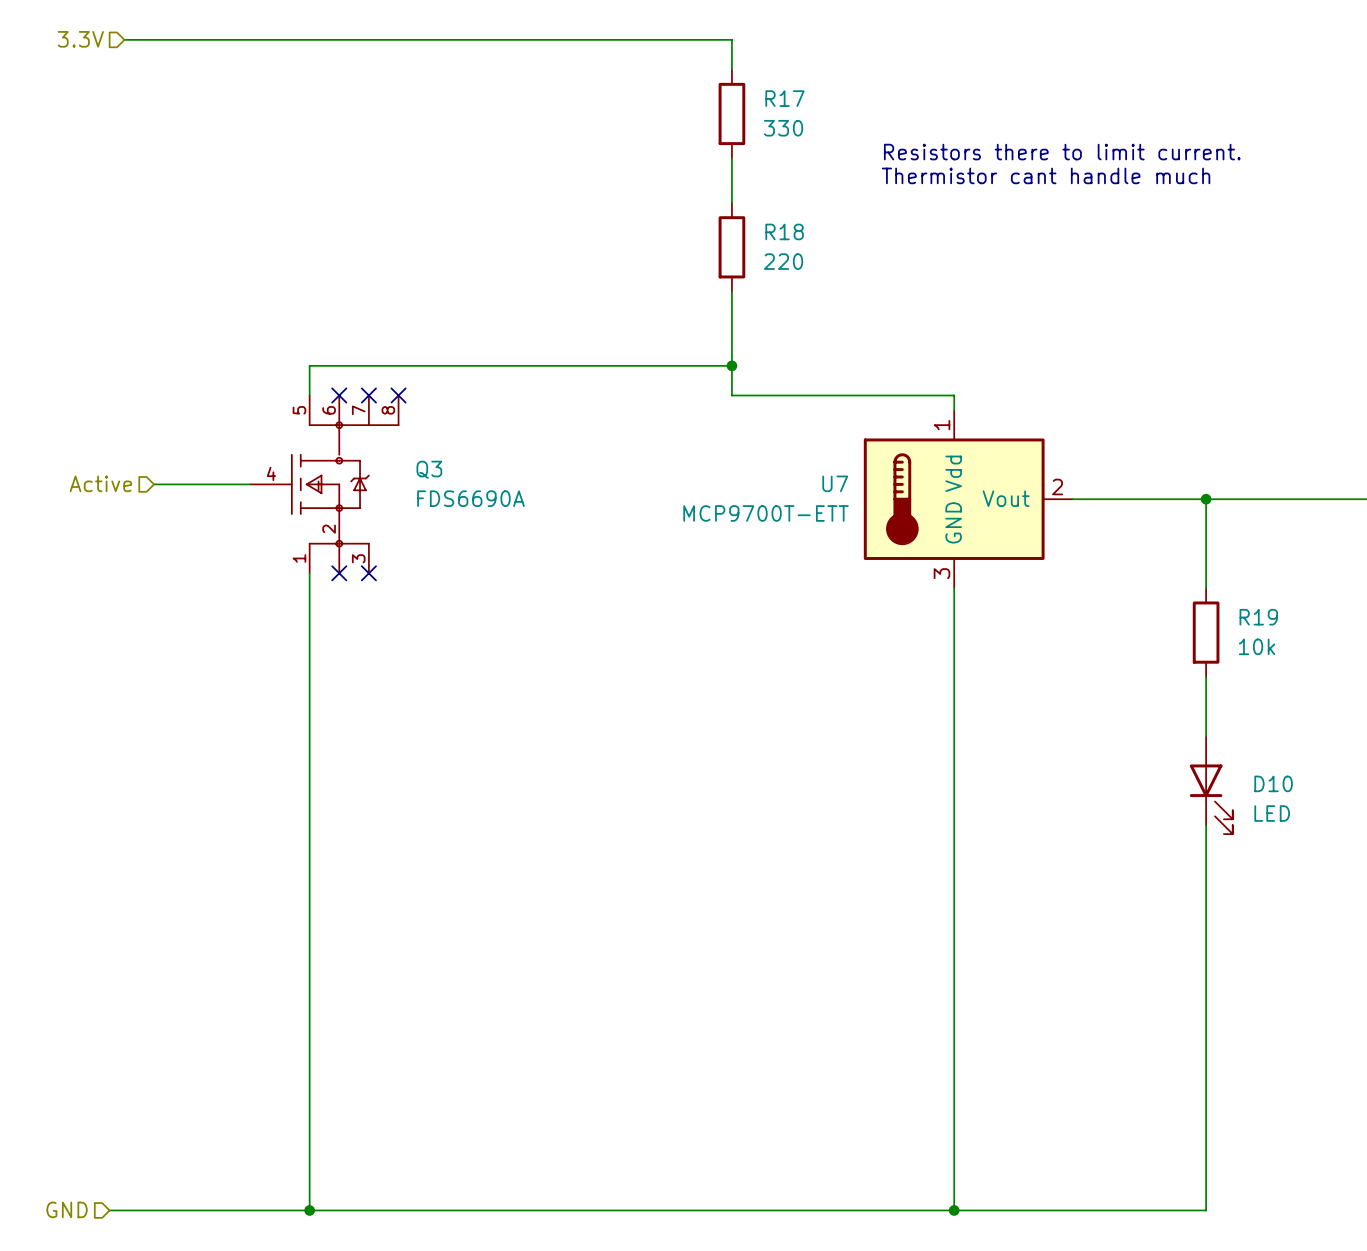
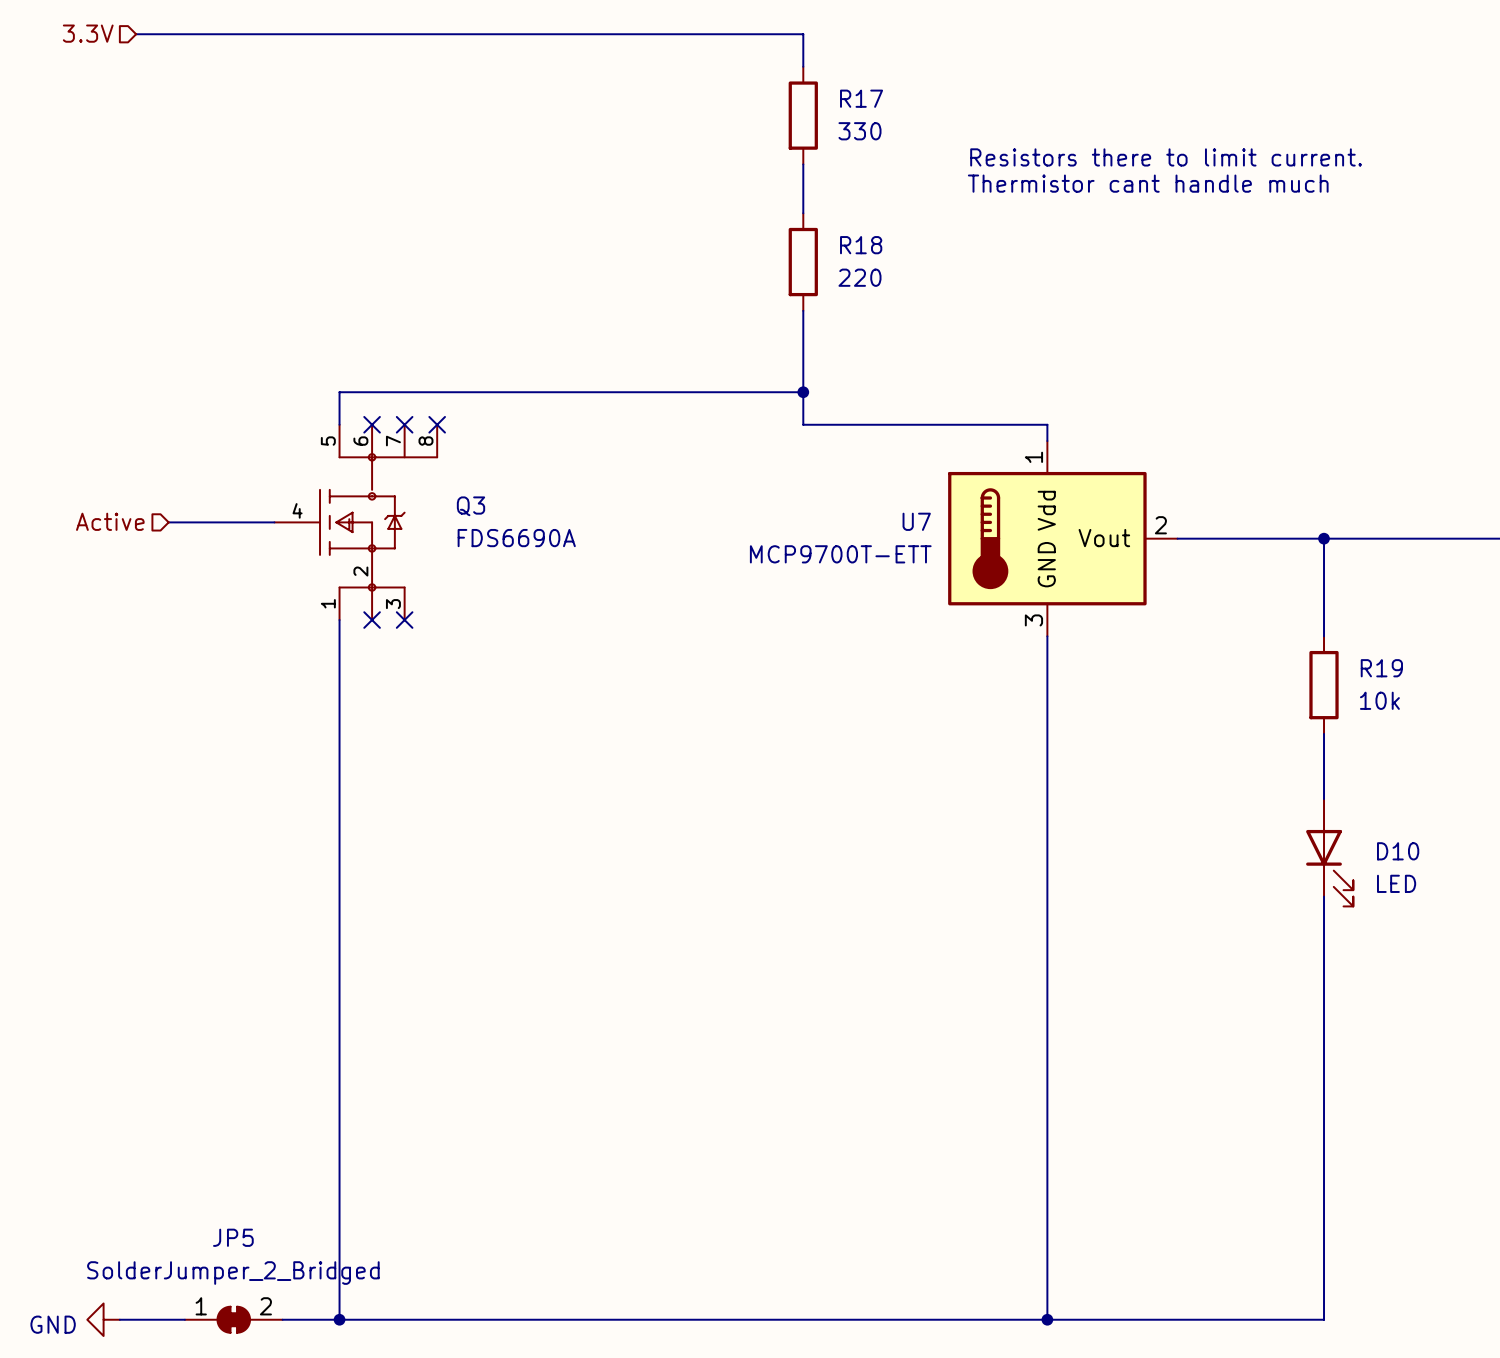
hierarchical label: GND (67, 1209) -> none
power symbol: none -> GND (103, 1319)
JP5: none -> SolderJumper_2_Bridged (233, 1319)

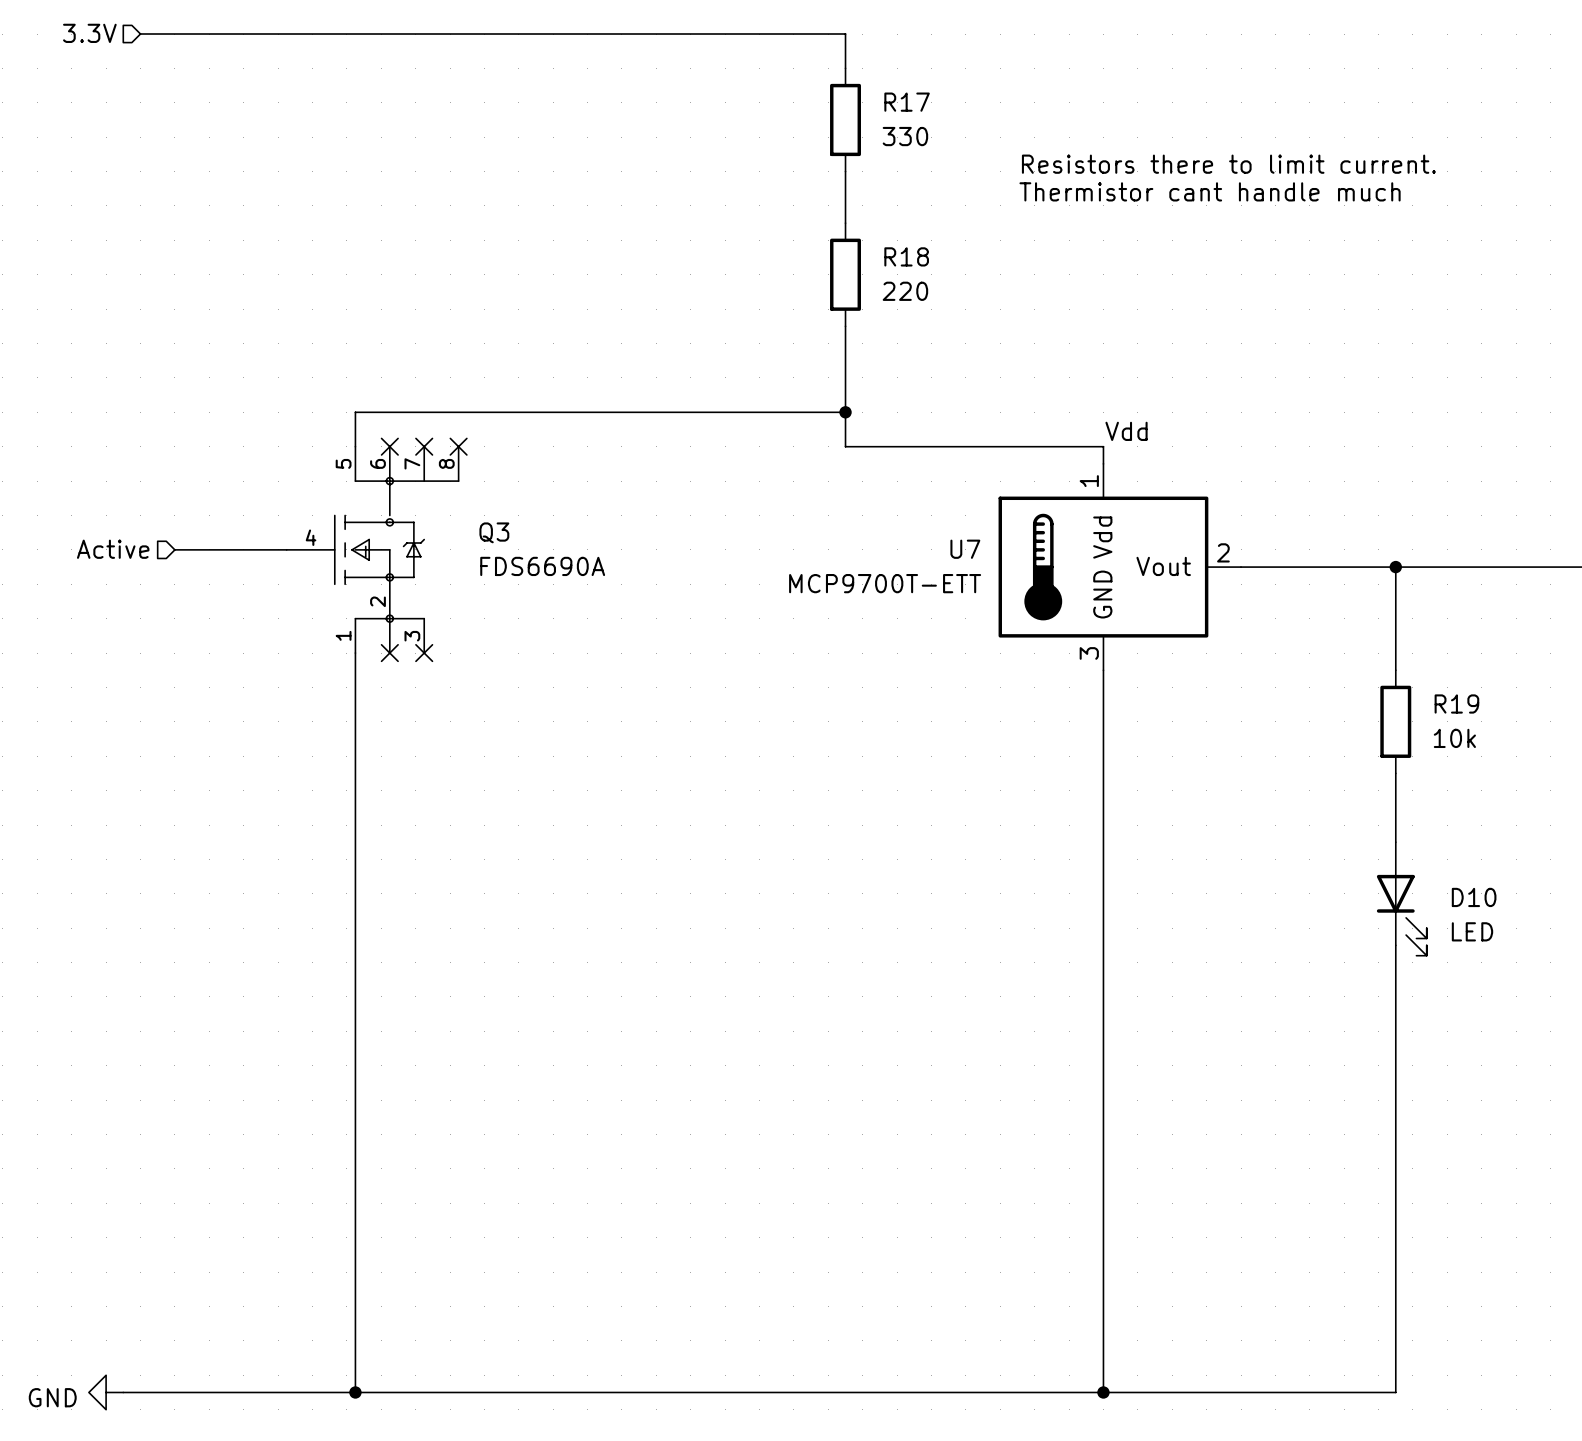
label: none -> Vdd (1126, 431)
JP5: SolderJumper_2_Bridged (233, 1319) -> none

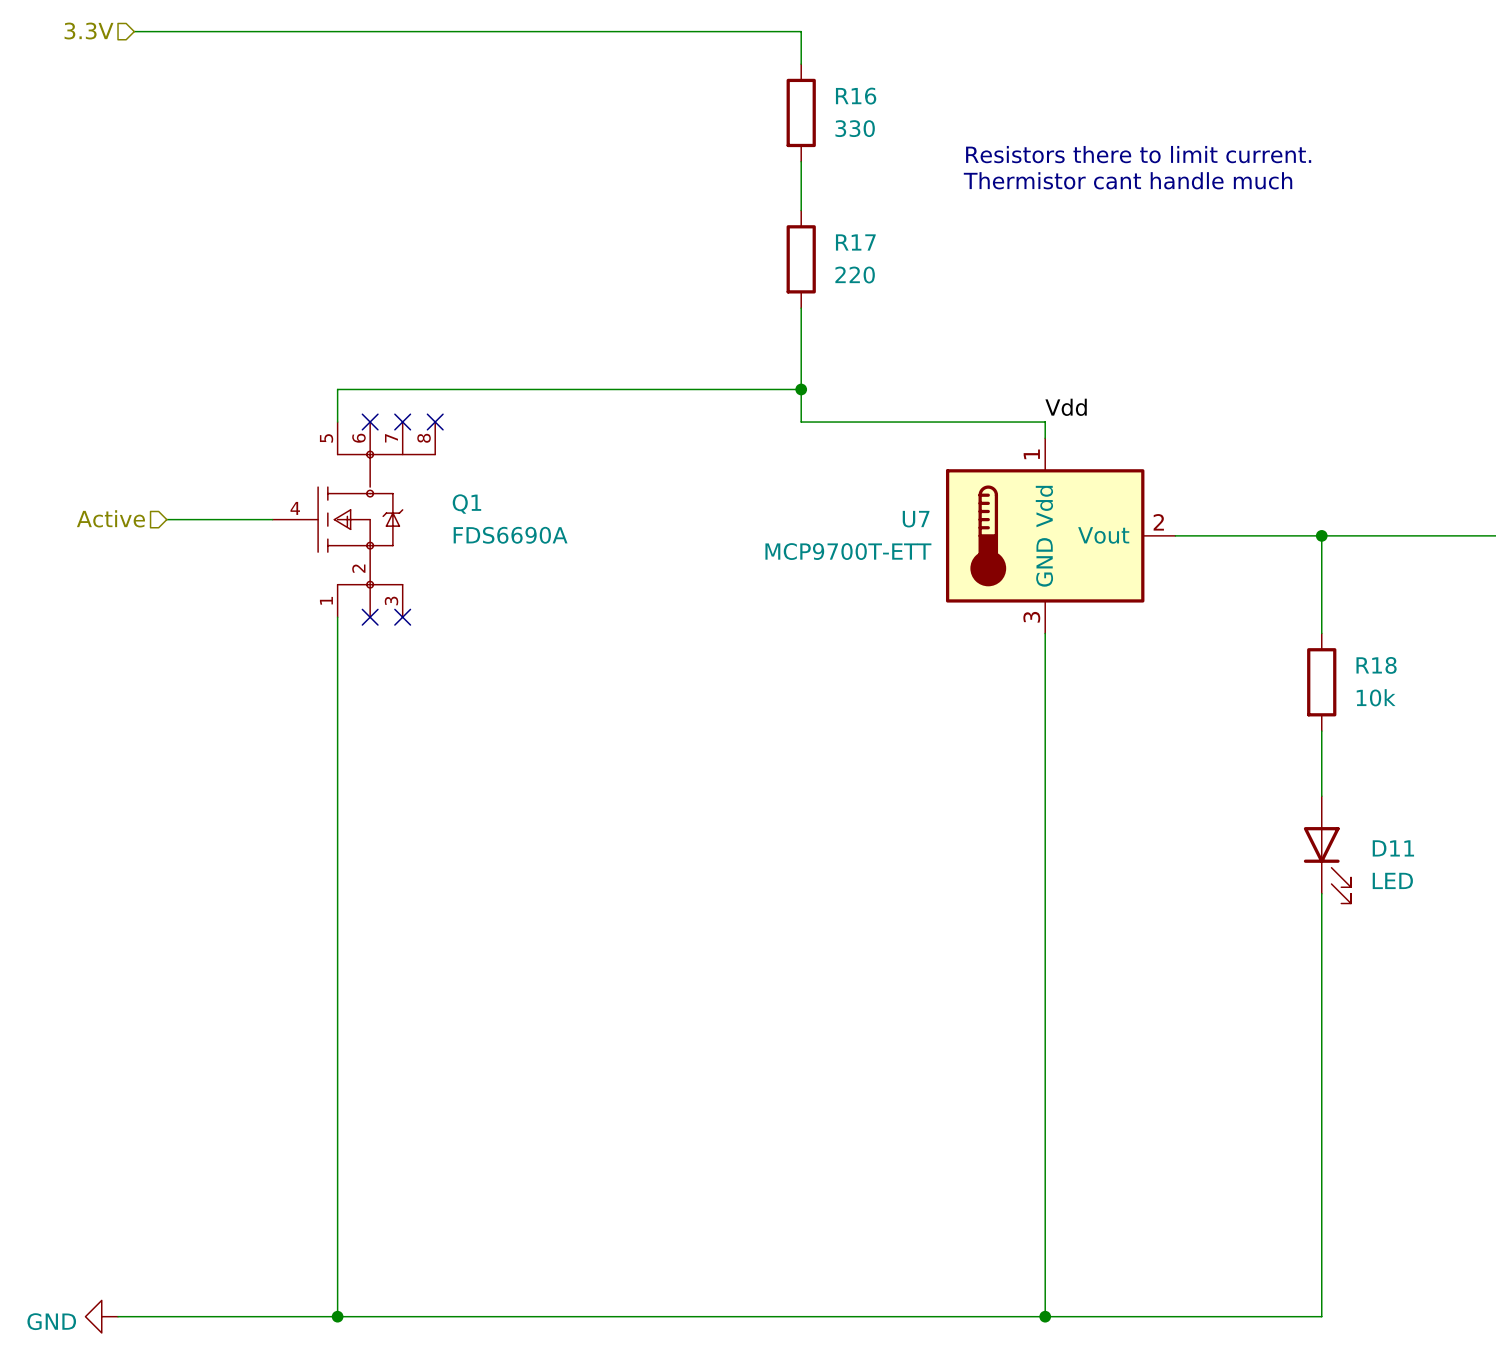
R17 name: R17 (907, 102) -> R16 (856, 96)
R18 name: R18 (906, 256) -> R17 (855, 242)
Q3 name: Q3 (494, 532) -> Q1 (466, 504)
R19 name: R19 (1456, 704) -> R18 (1376, 665)
D10 name: D10 (1474, 897) -> D11 (1393, 848)

